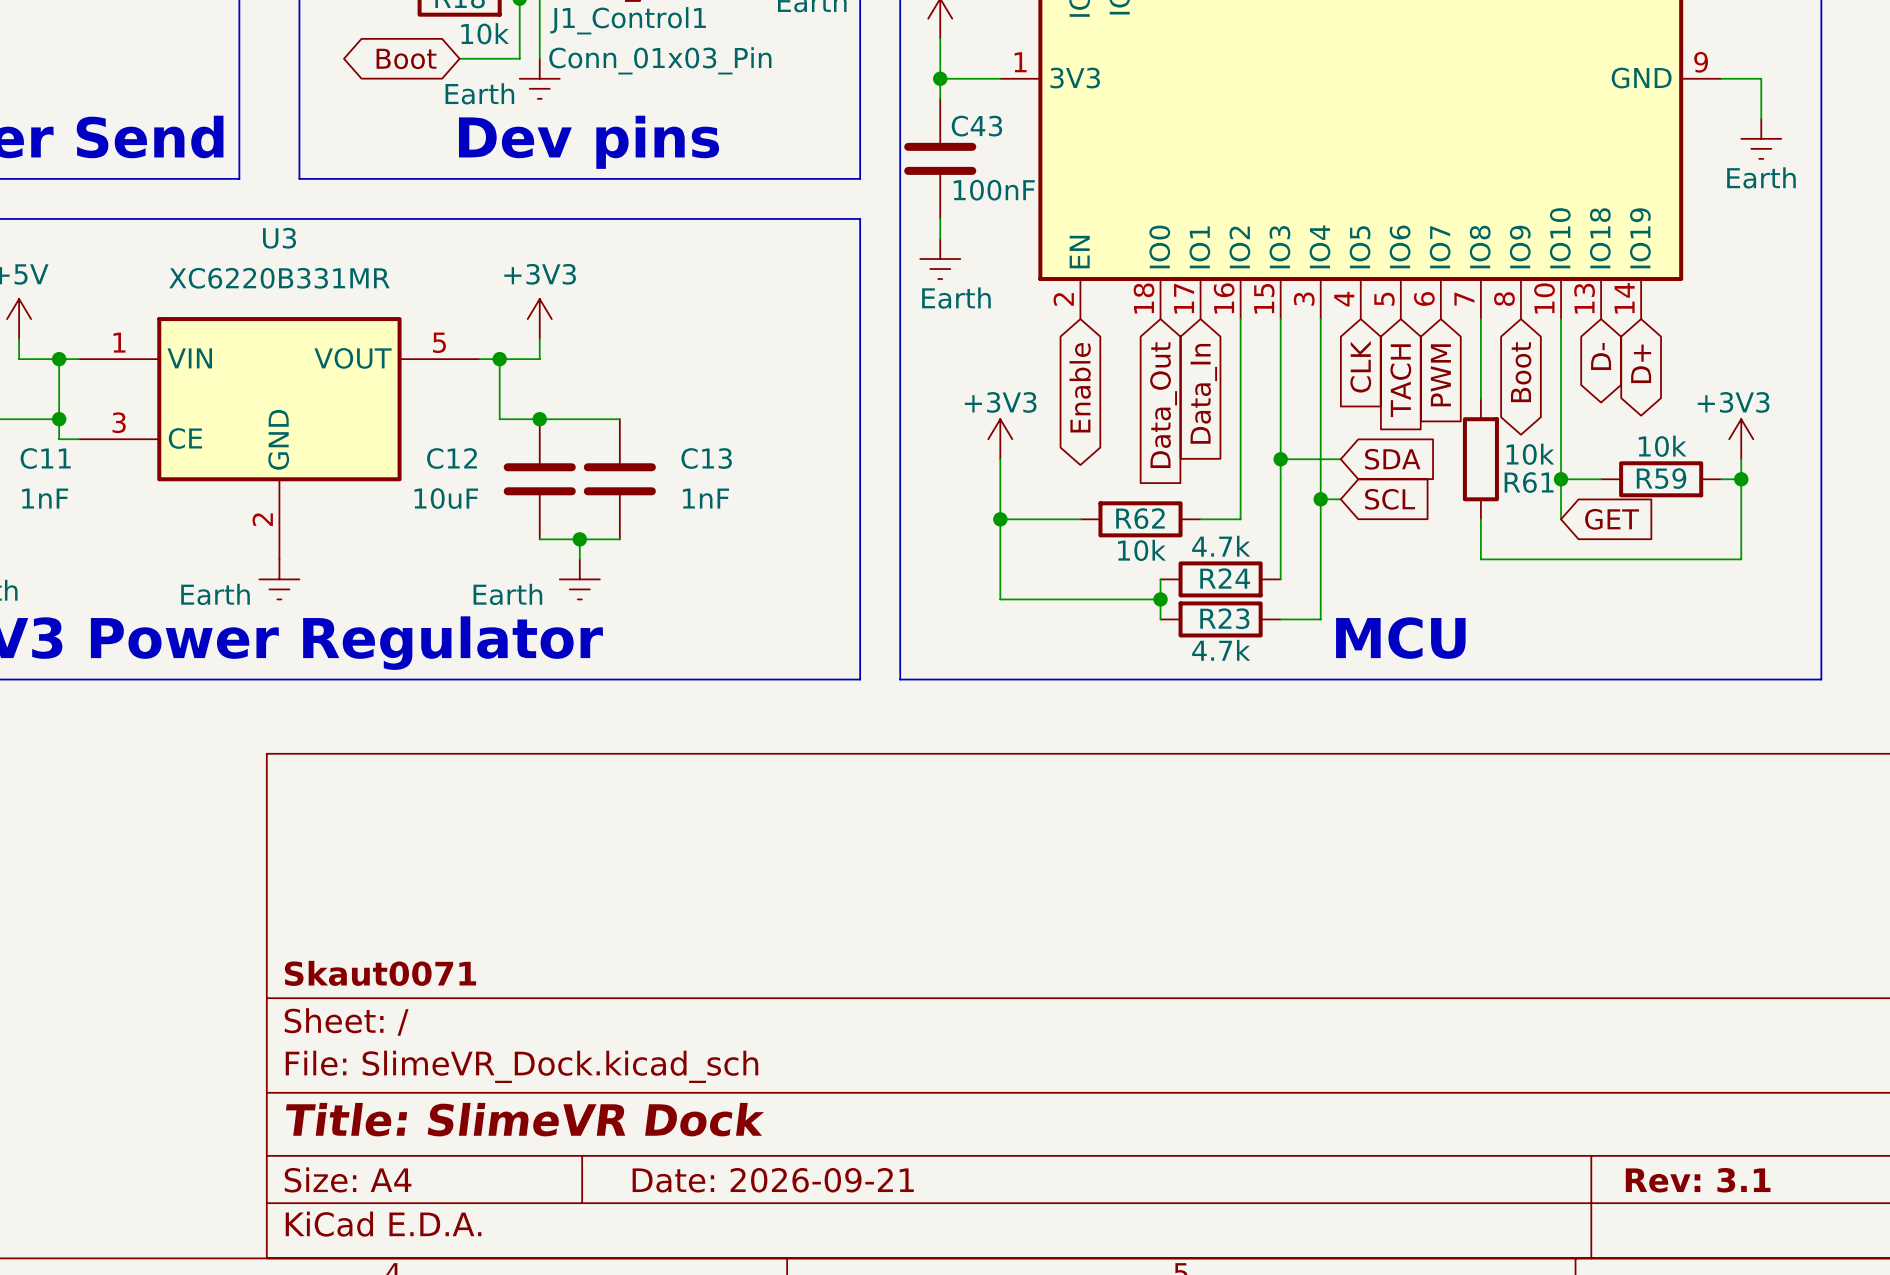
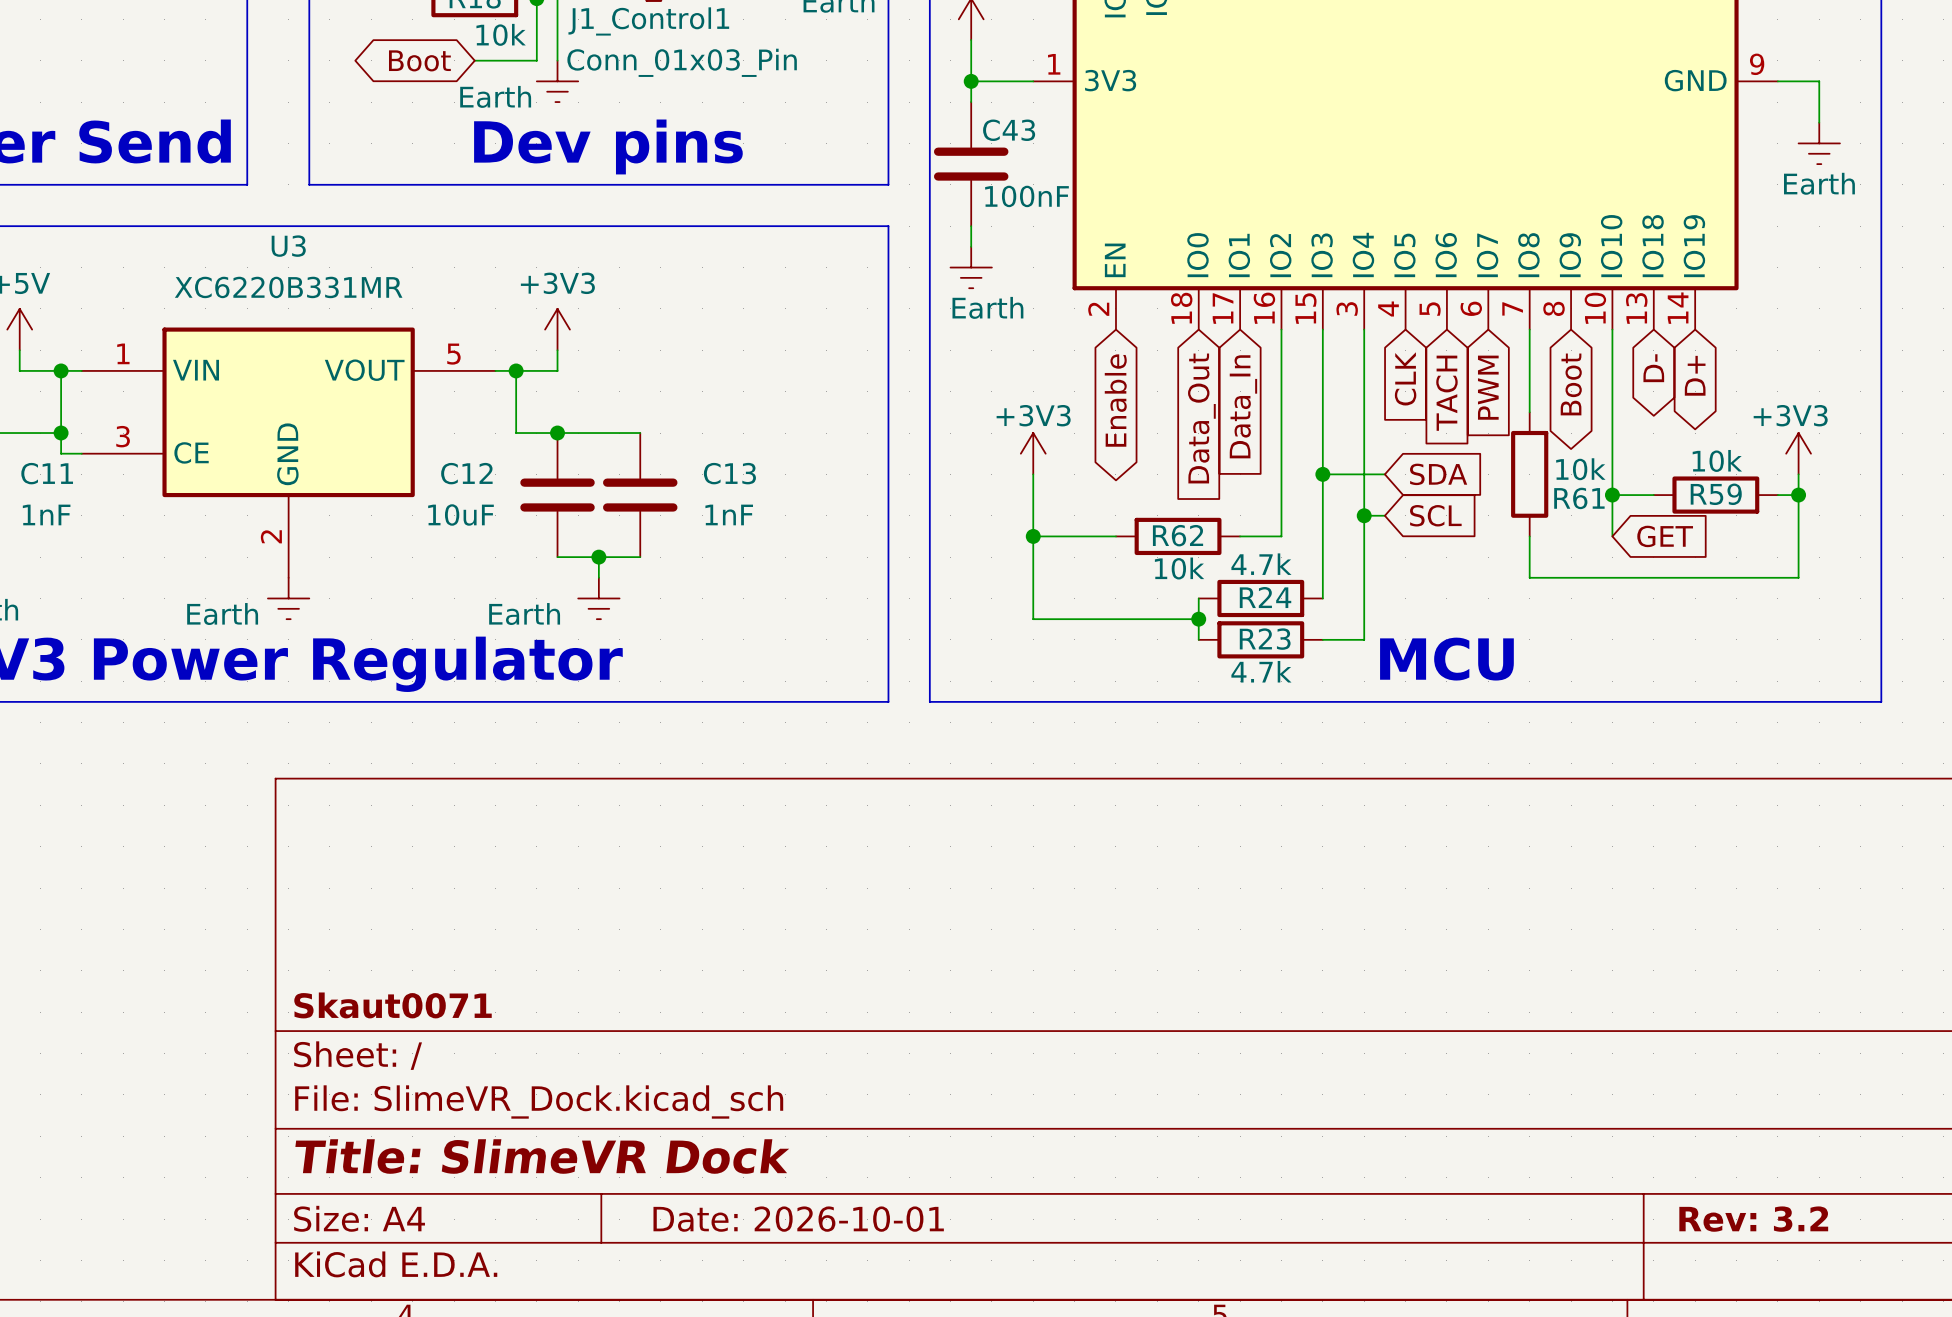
title block: Date: 2026-09-21 (773, 1180) -> Date: 2026-10-01 (798, 1219)
title block: Rev: 3.1 (1698, 1180) -> Rev: 3.2 (1753, 1219)

